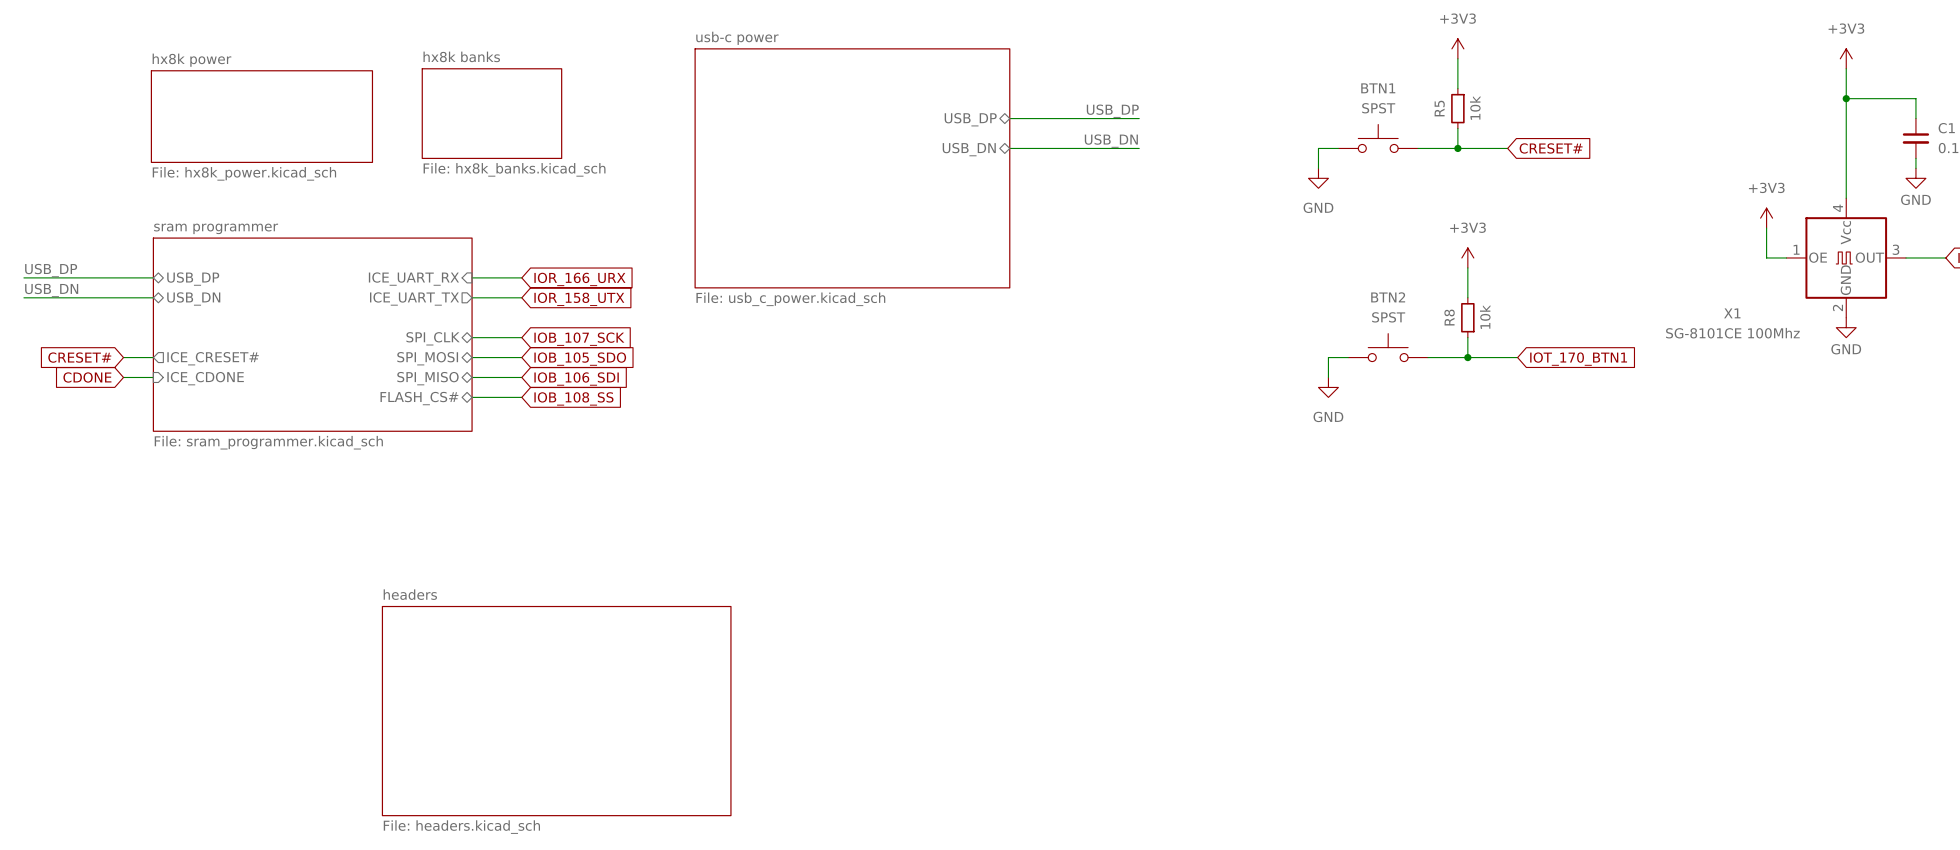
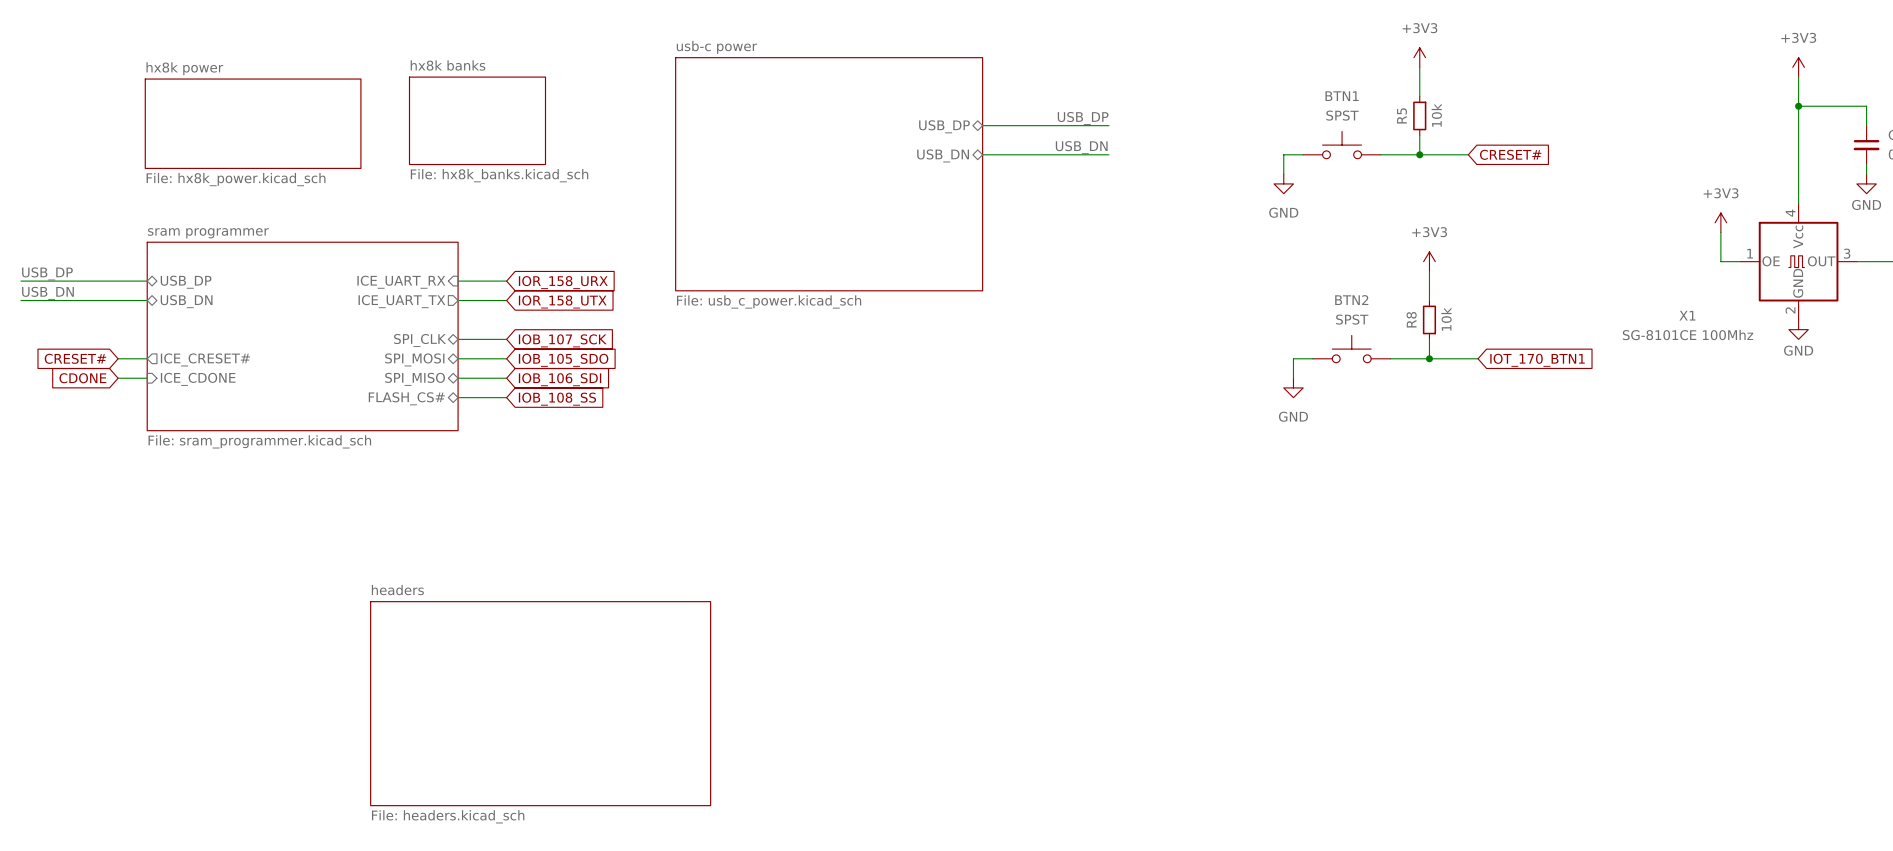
global label: IOR_166_URX (579, 279) -> IOR_158_URX (563, 282)

